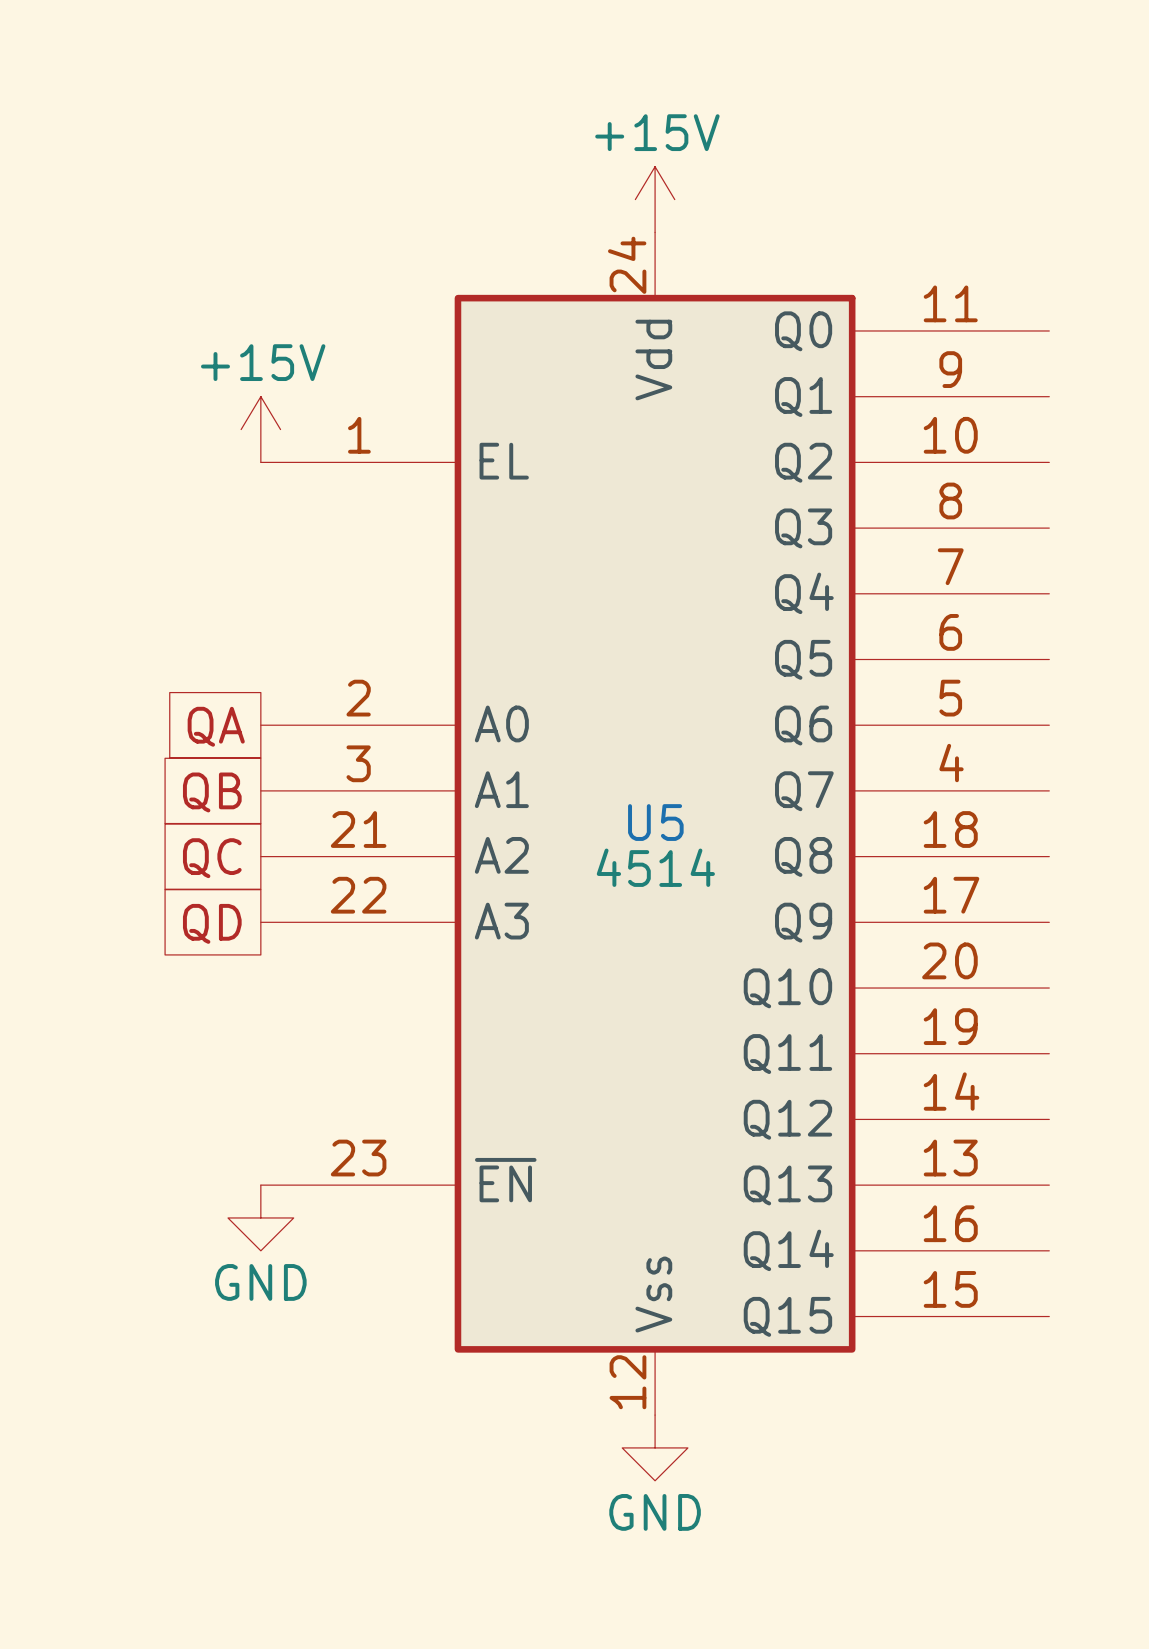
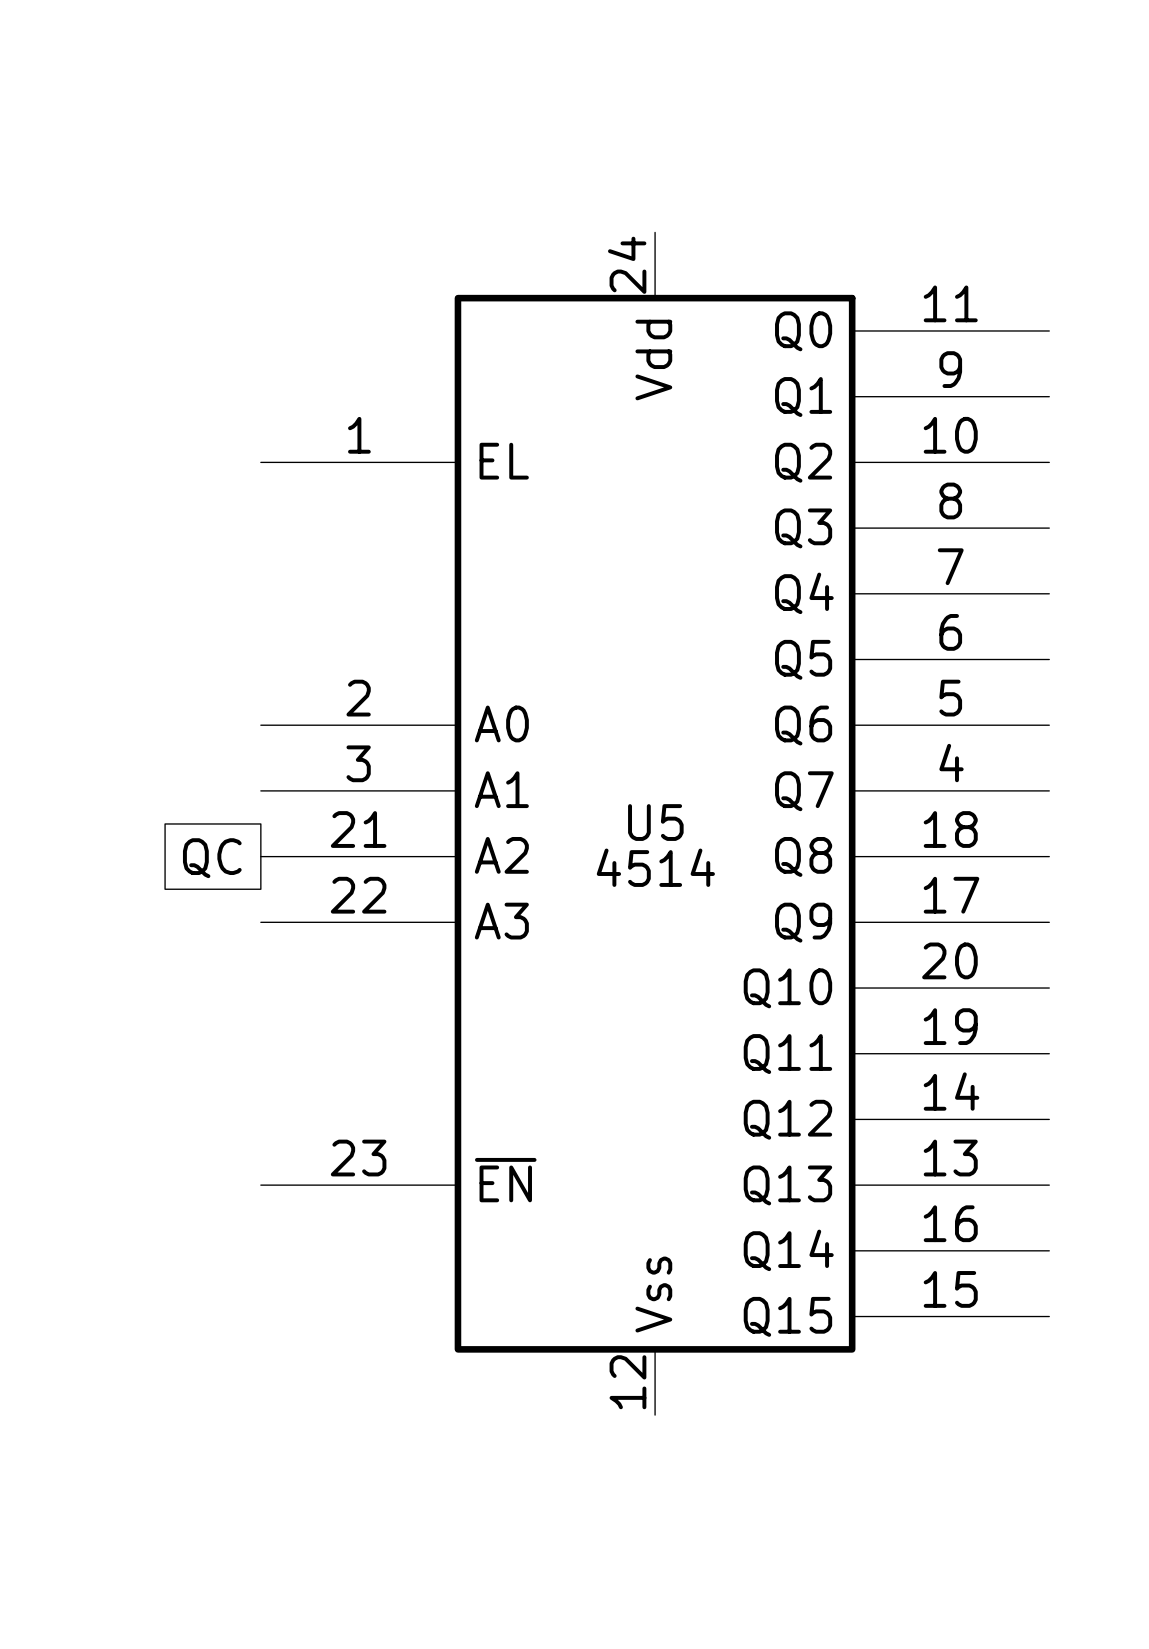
power symbol: +15V (655, 199) -> none
power symbol: +15V (260, 429) -> none
global label: QA (216, 726) -> none
global label: QB (212, 792) -> none
global label: QD (212, 923) -> none
power symbol: GND (260, 1217) -> none
power symbol: GND (655, 1447) -> none

